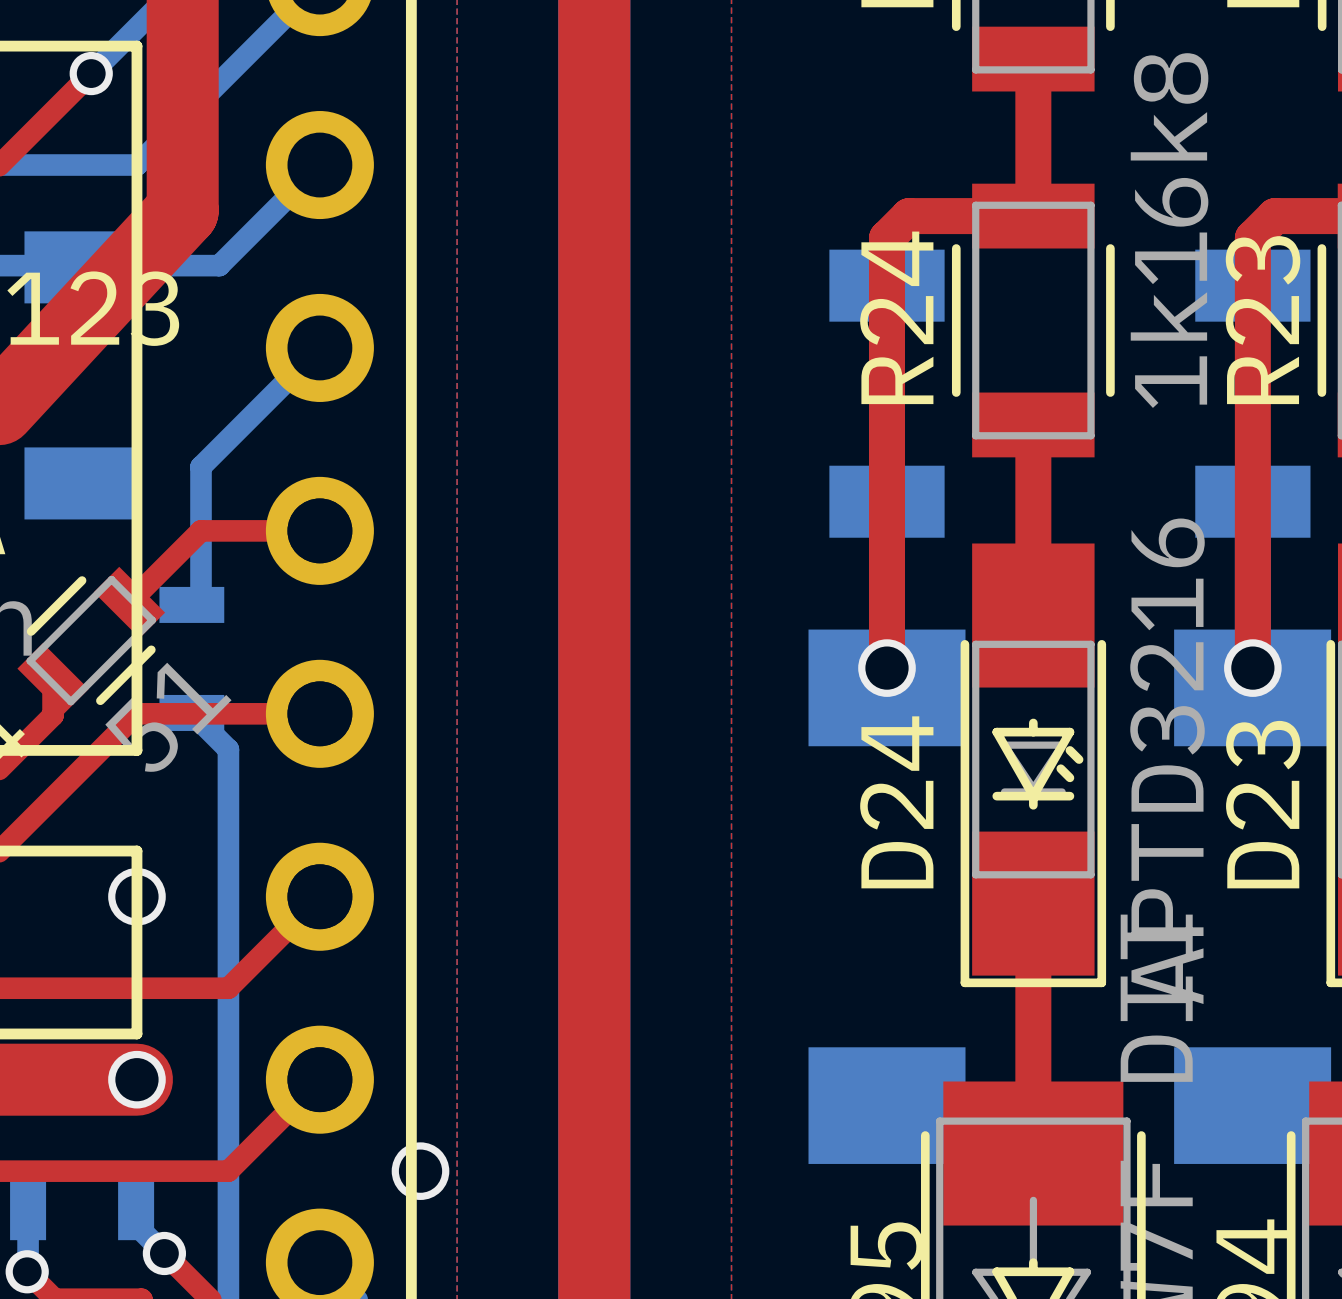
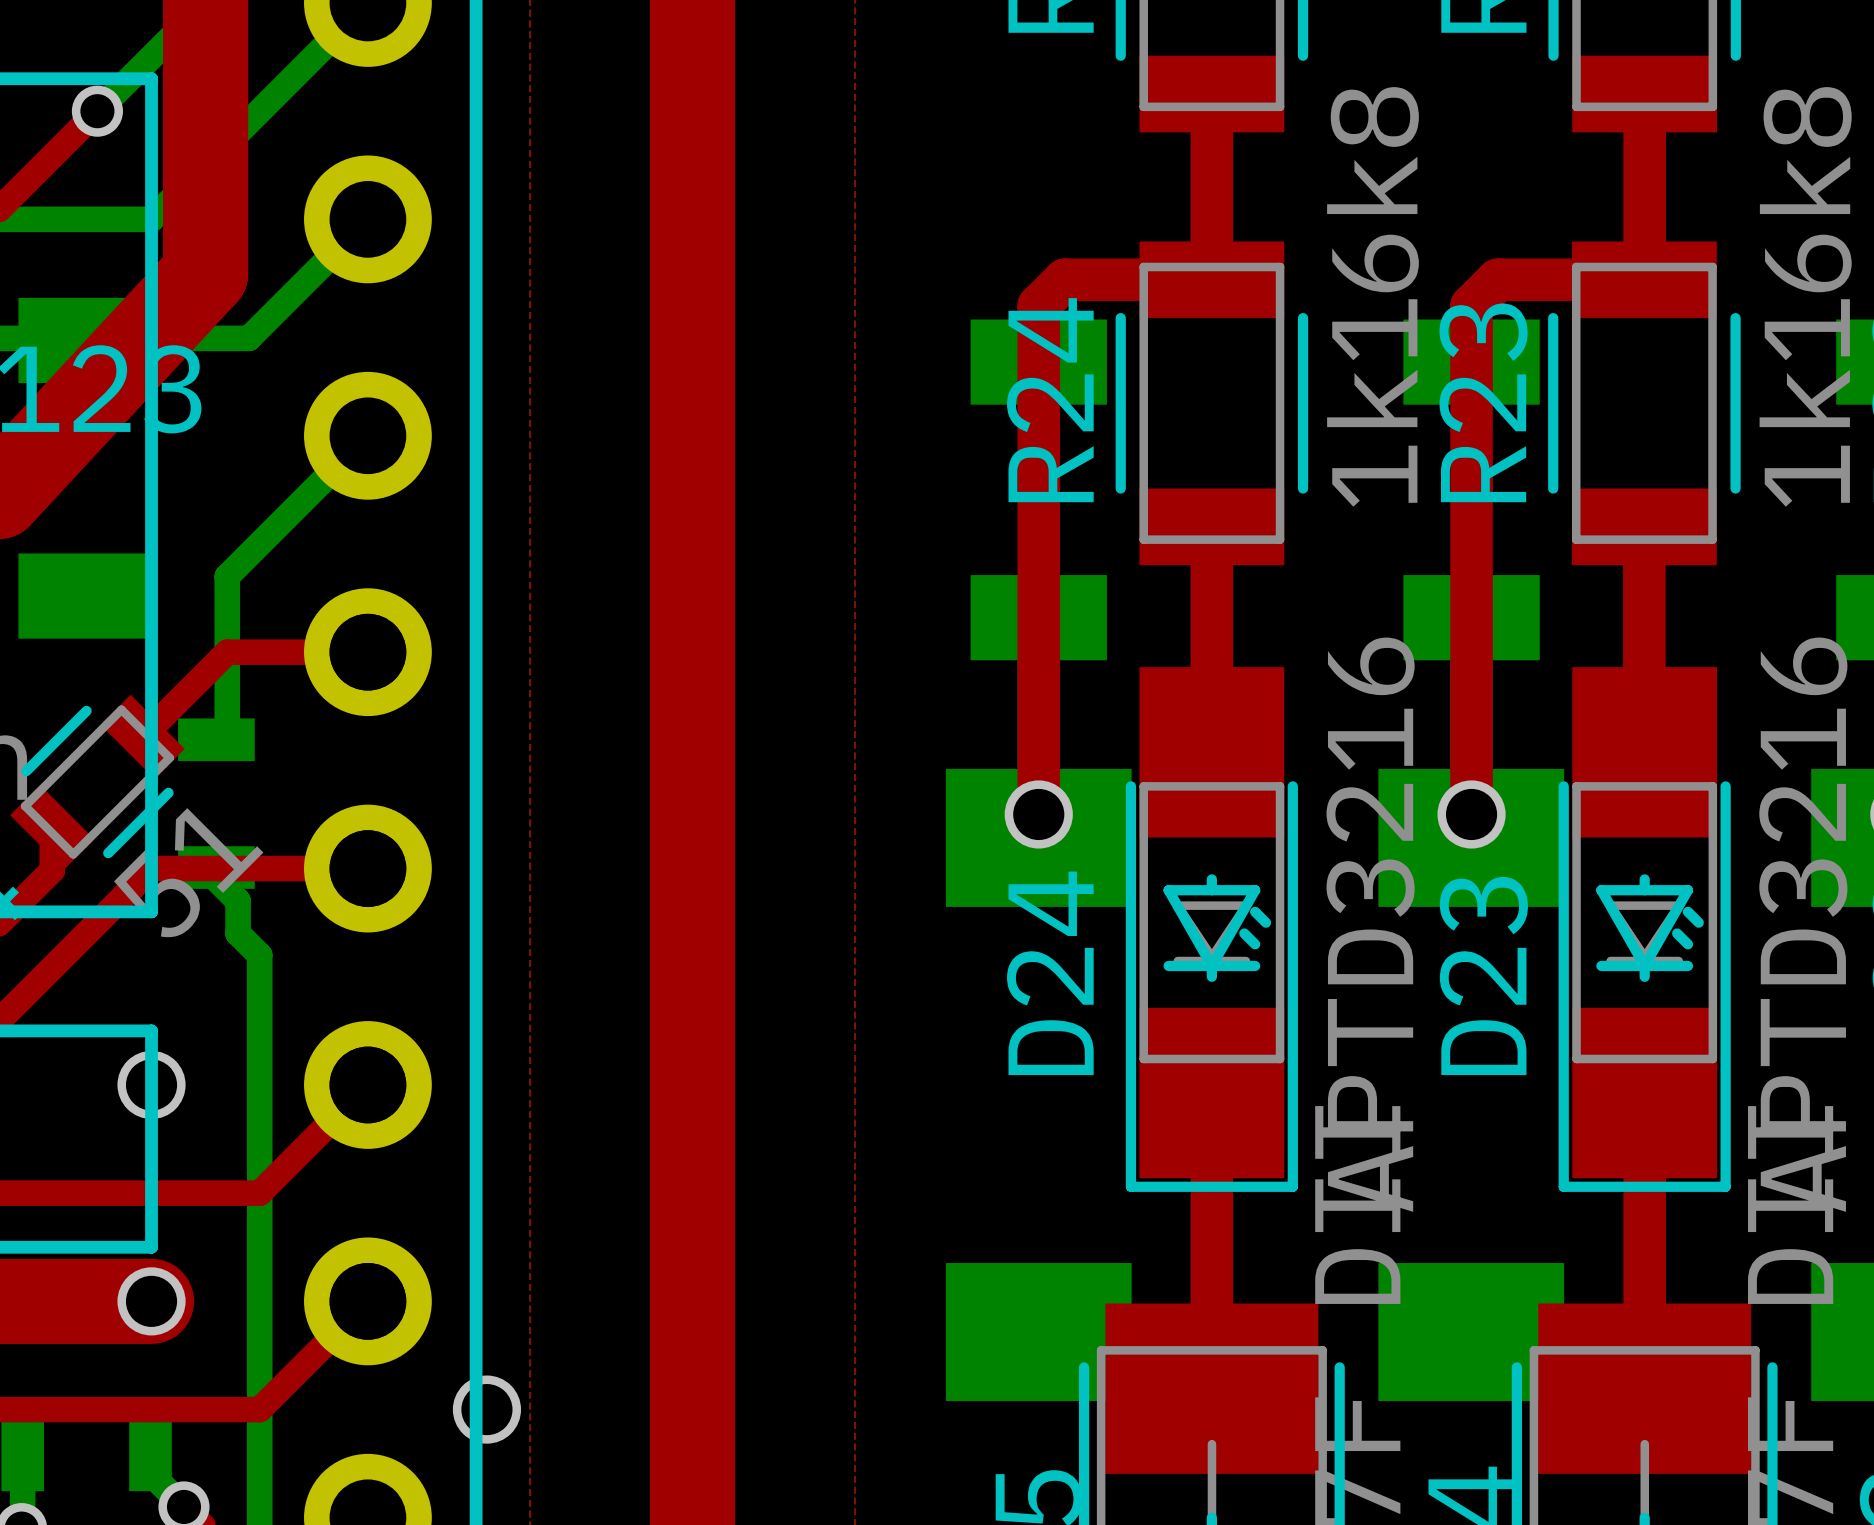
bottom track: (191, 712) (228, 749) (228, 787) -> (205, 868) (238, 901) (238, 933) (259, 955)

